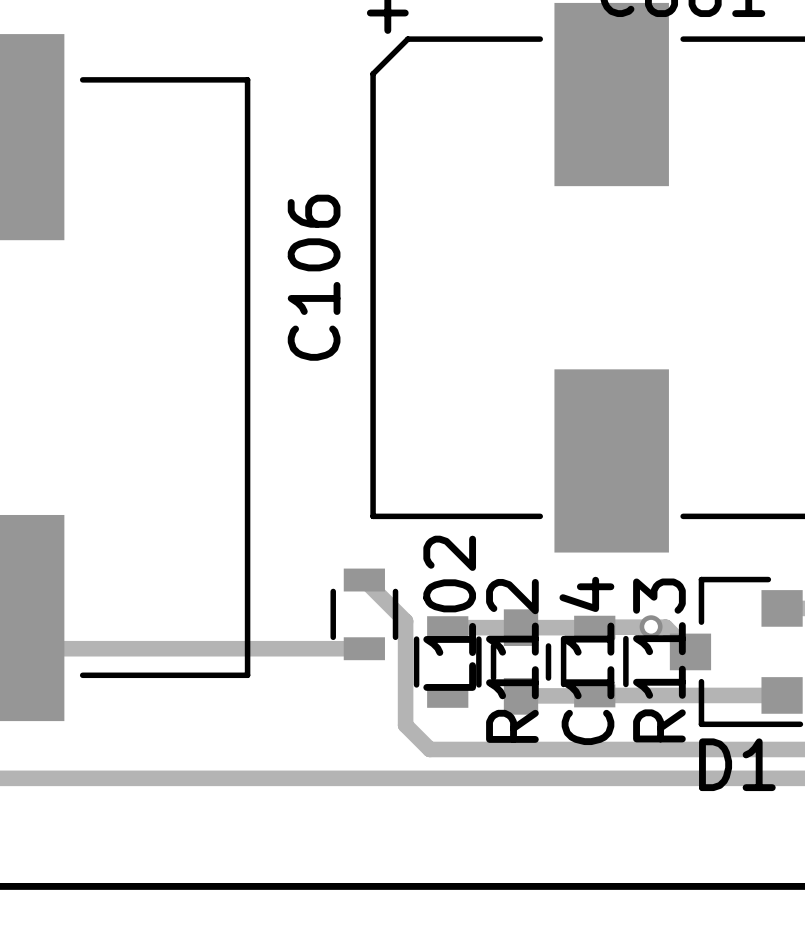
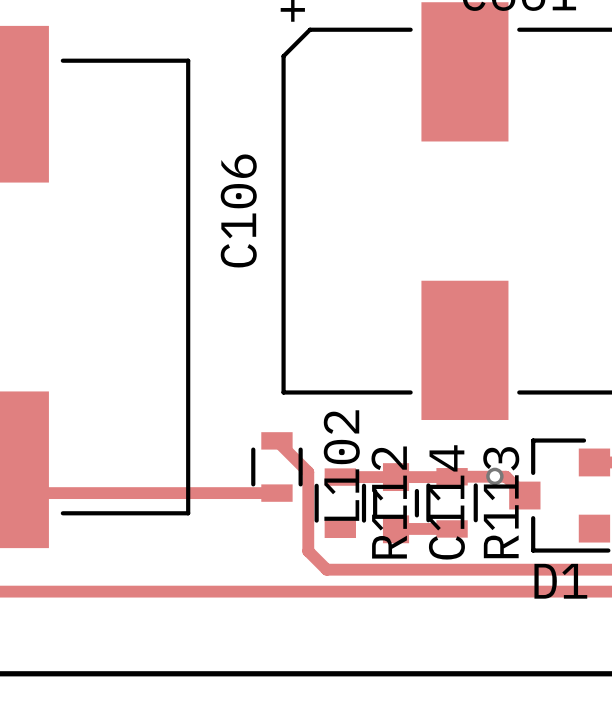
track: (595, 695) (782, 695) -> none

